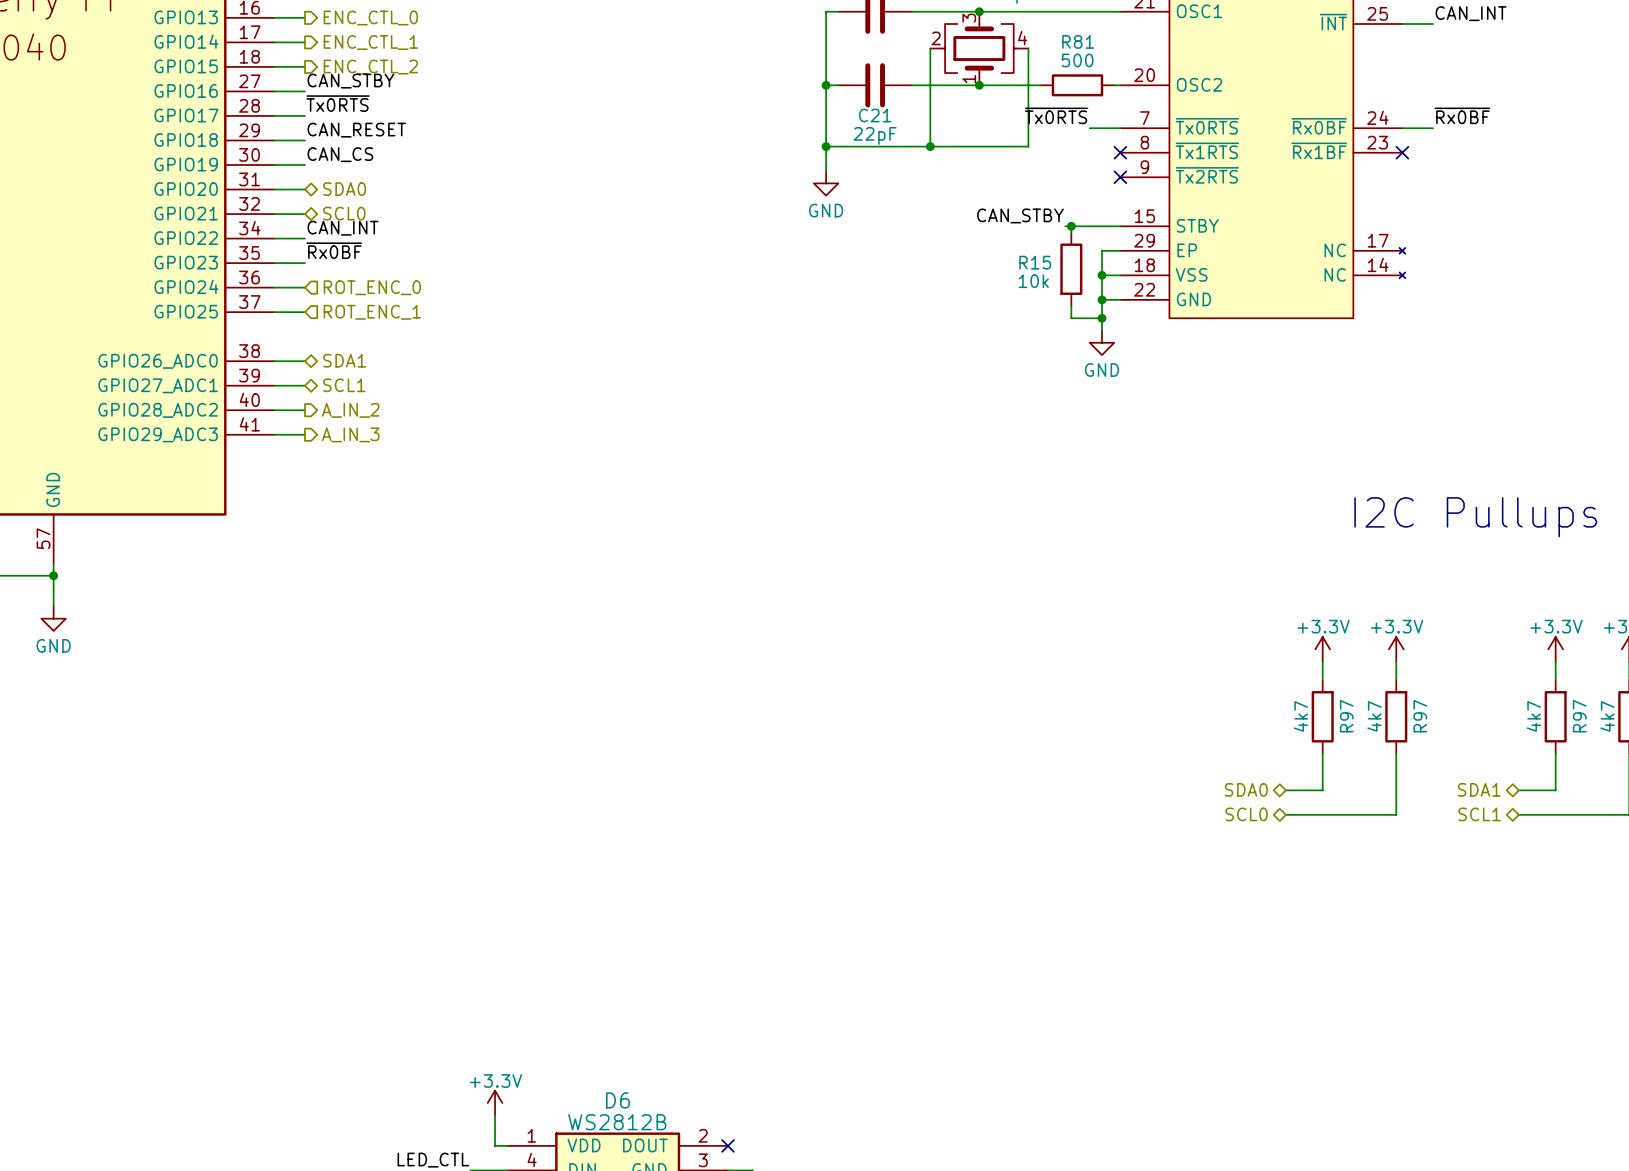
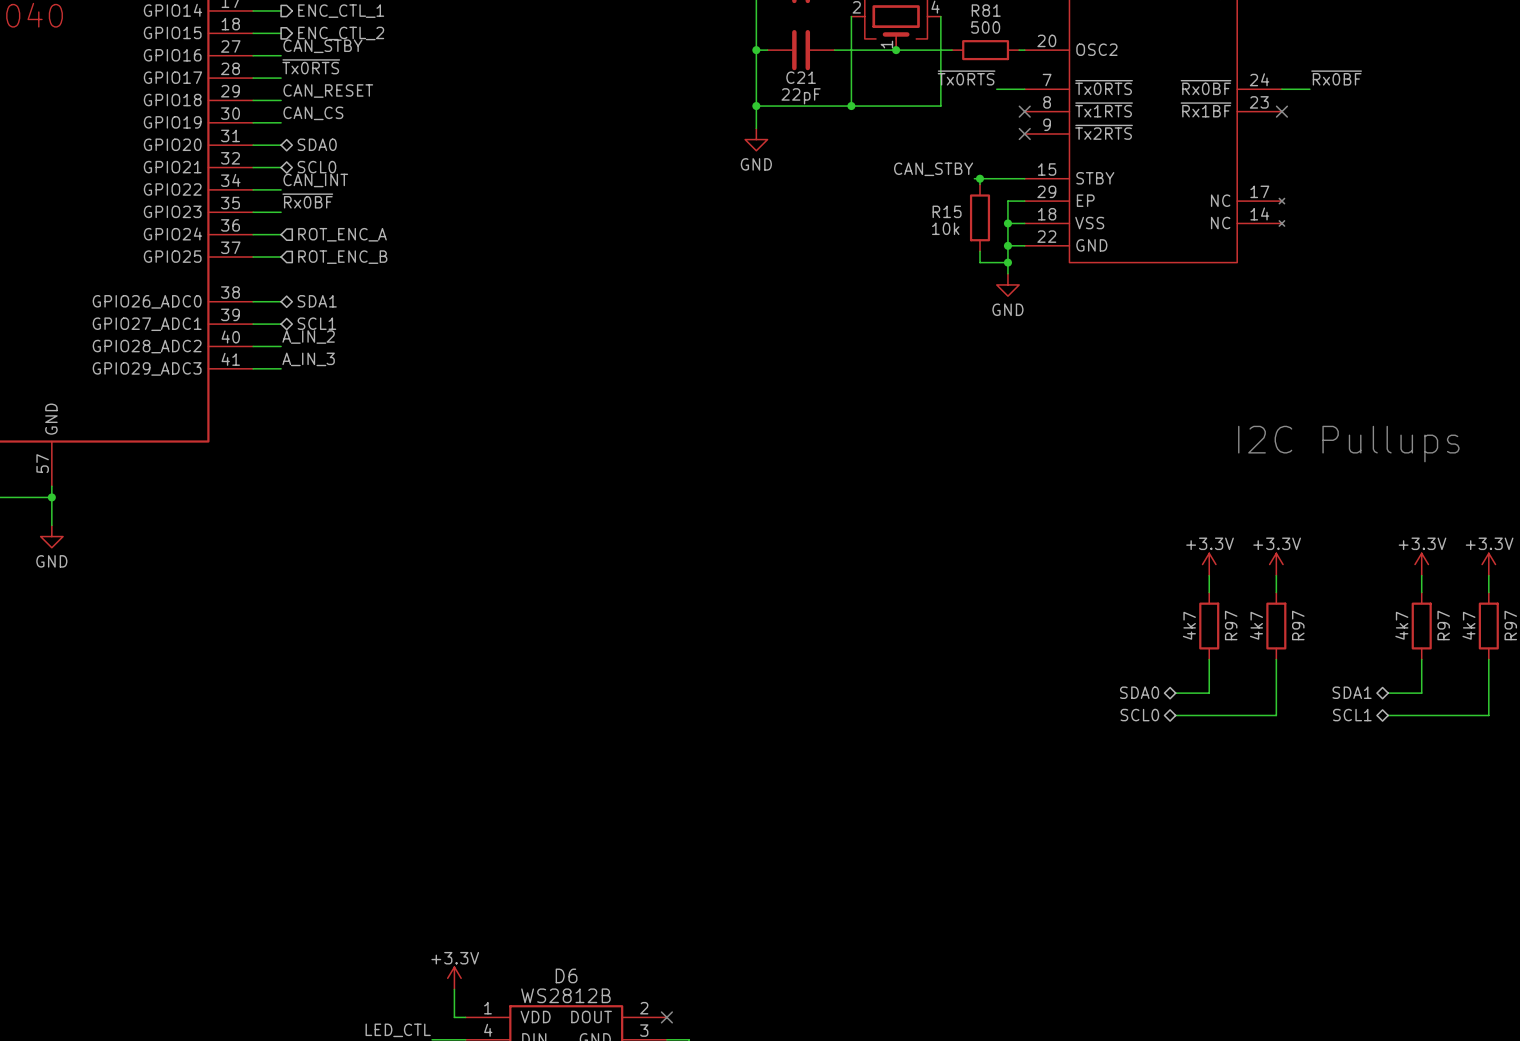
hierarchical label: ROT_ENC_0 (372, 287) -> ROT_ENC_A (342, 234)
hierarchical label: ROT_ENC_1 (372, 312) -> ROT_ENC_B (342, 257)
label: none -> A_IN_2 (308, 337)
hierarchical label: A_IN_2 (350, 410) -> none
label: none -> A_IN_3 (308, 359)
hierarchical label: A_IN_3 (350, 434) -> none

